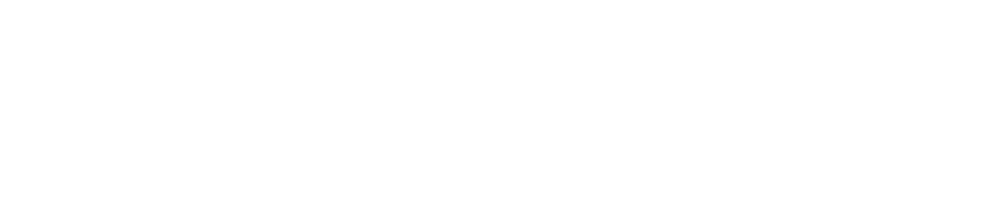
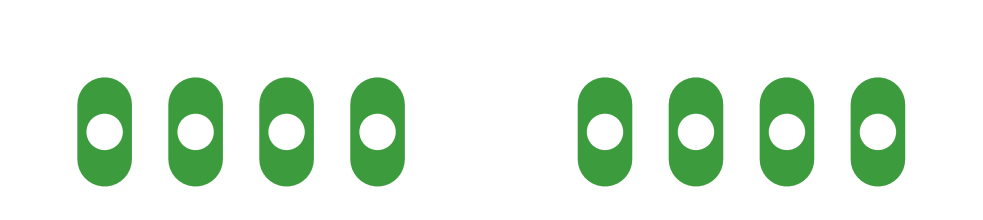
part: none -> (241, 131)
part: none -> (741, 131)

